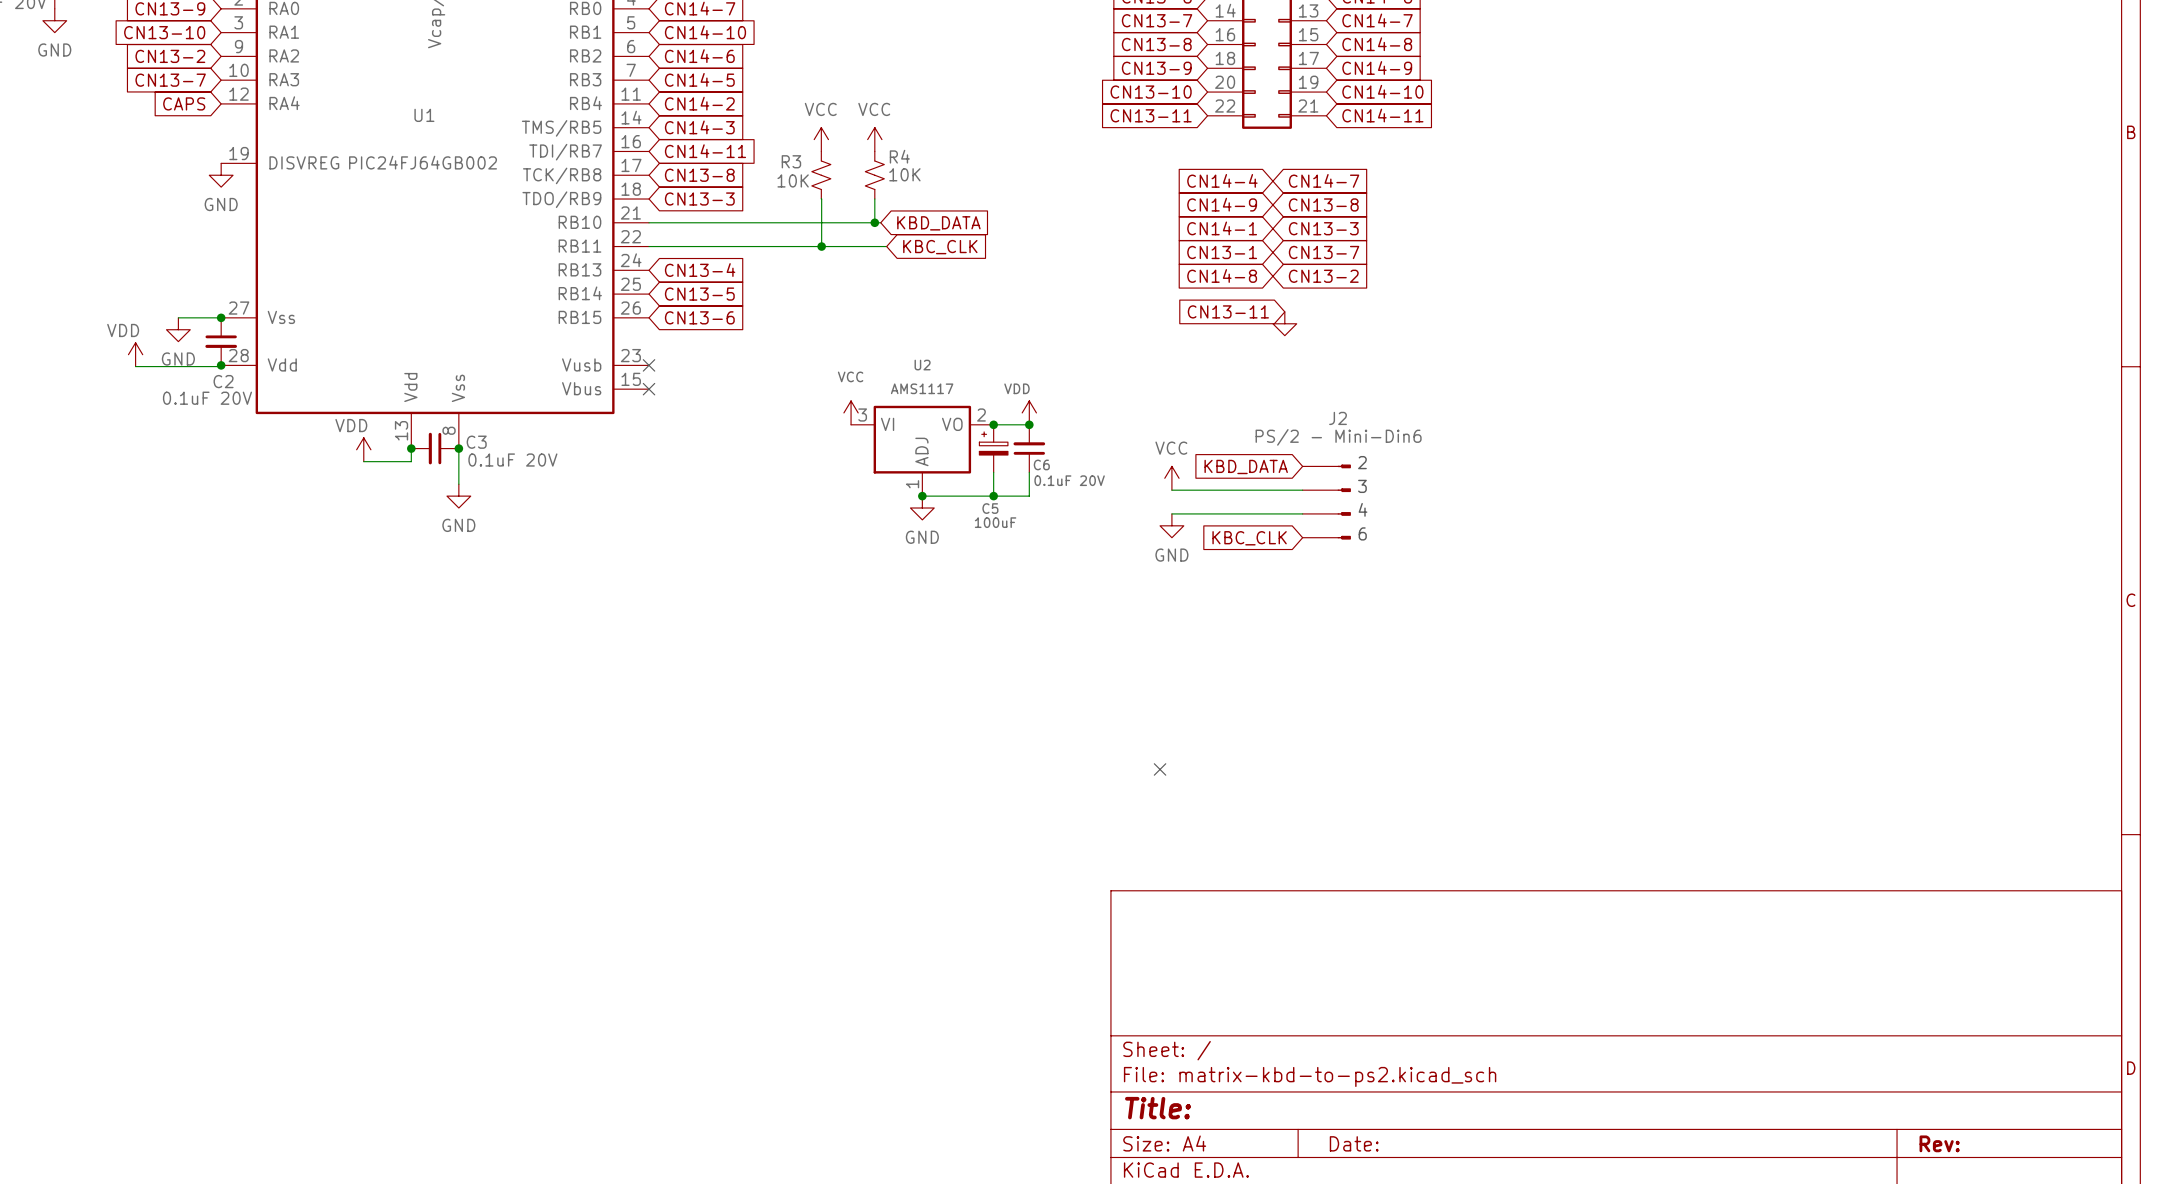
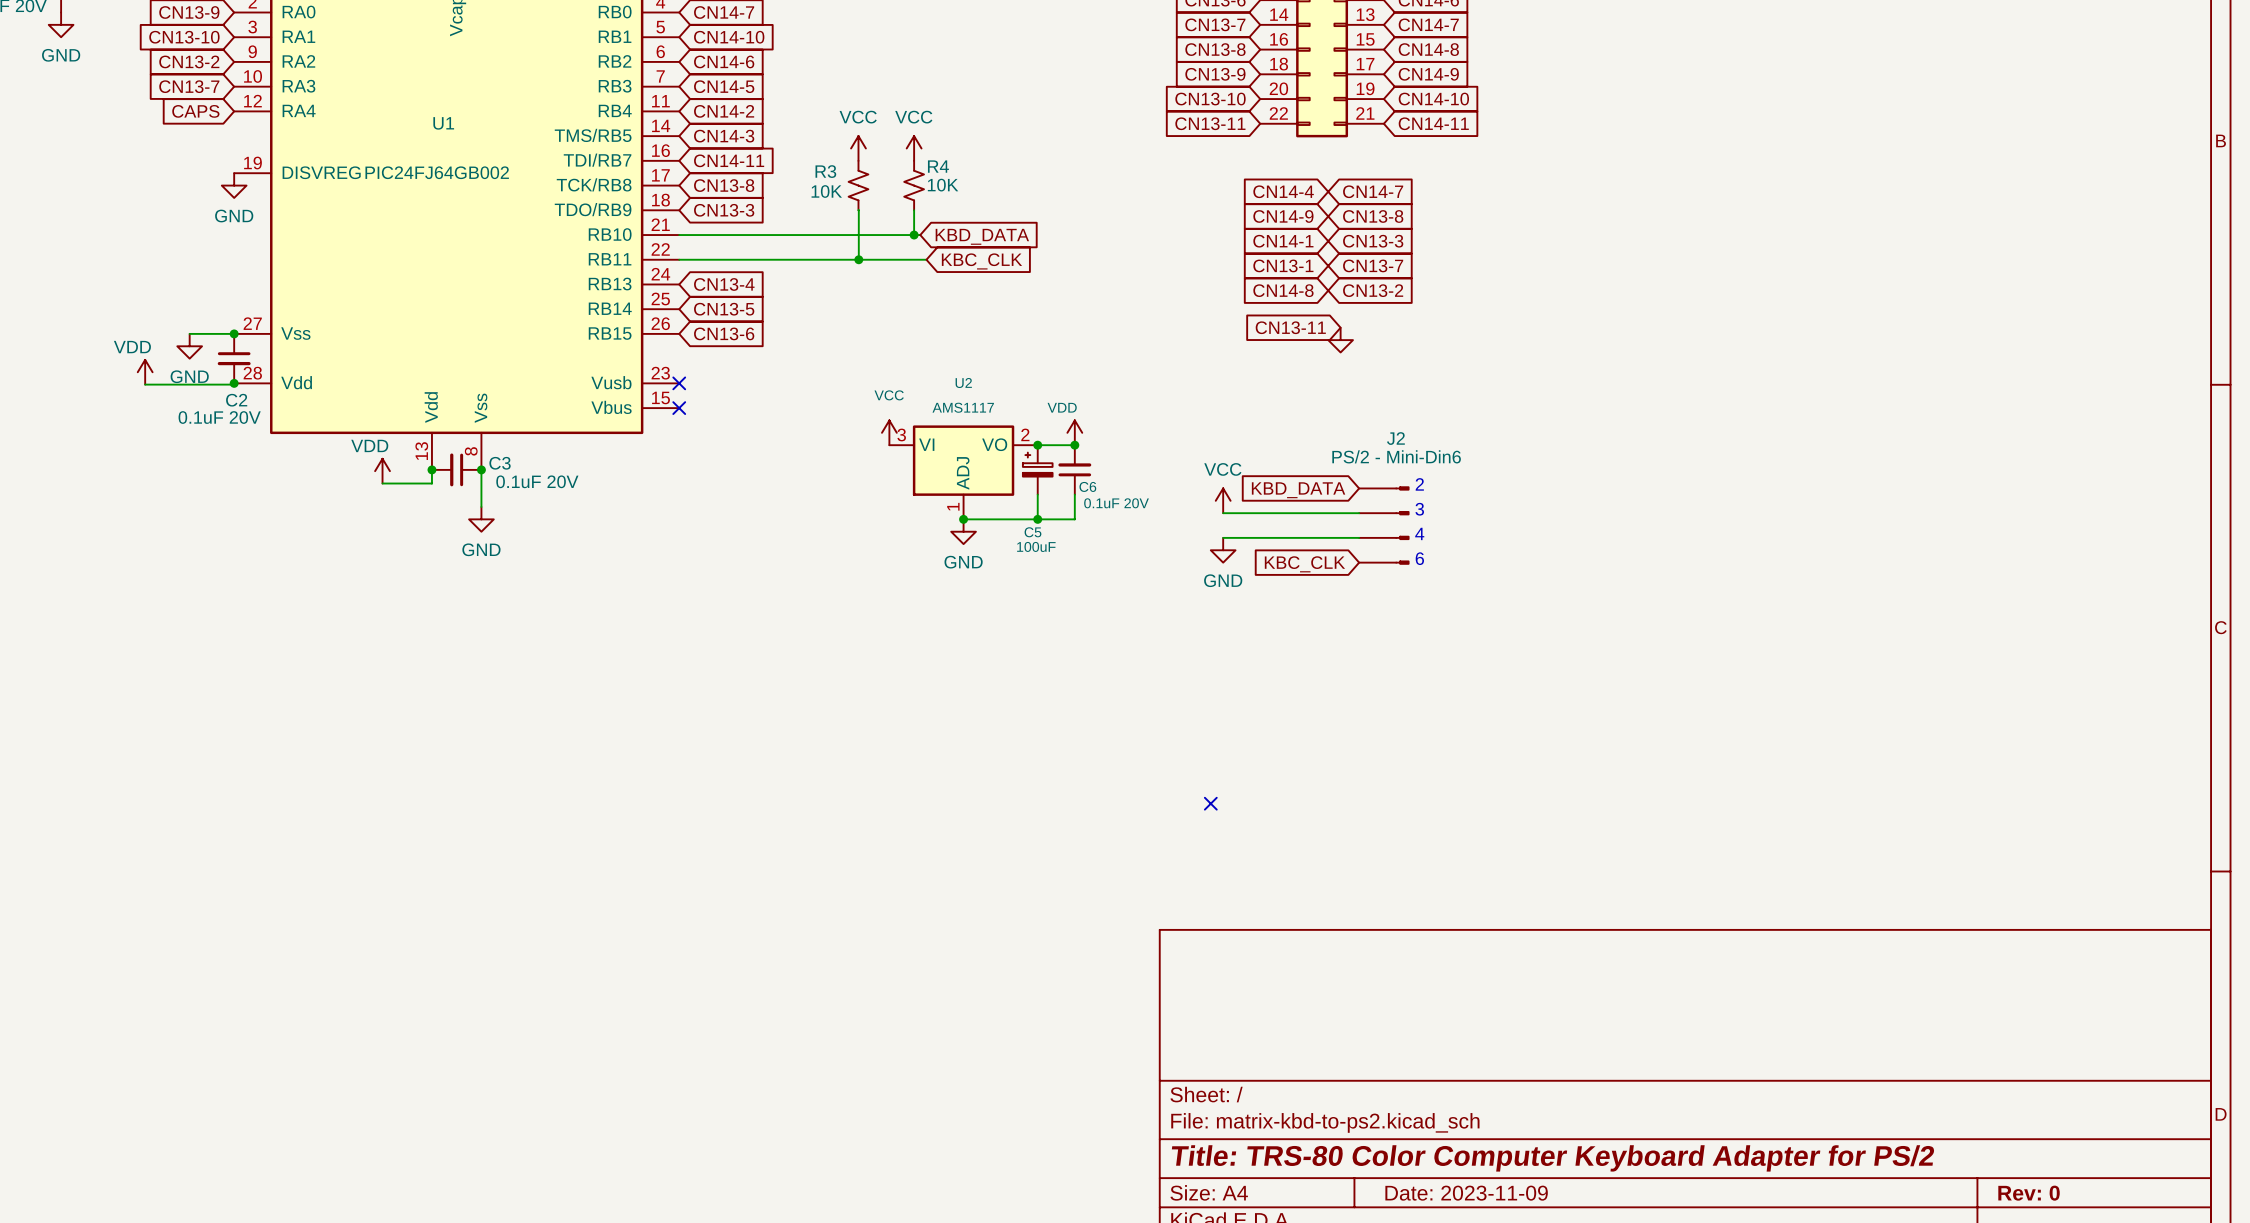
title block: Title: (1158, 1108) -> Title: TRS-80 Color Computer Keyboard Adapter for PS/2 (1553, 1158)
title block: Date: (1354, 1143) -> Date: 2023-11-09 (1466, 1193)
title block: Rev: (1939, 1143) -> Rev: 0 (2029, 1193)

